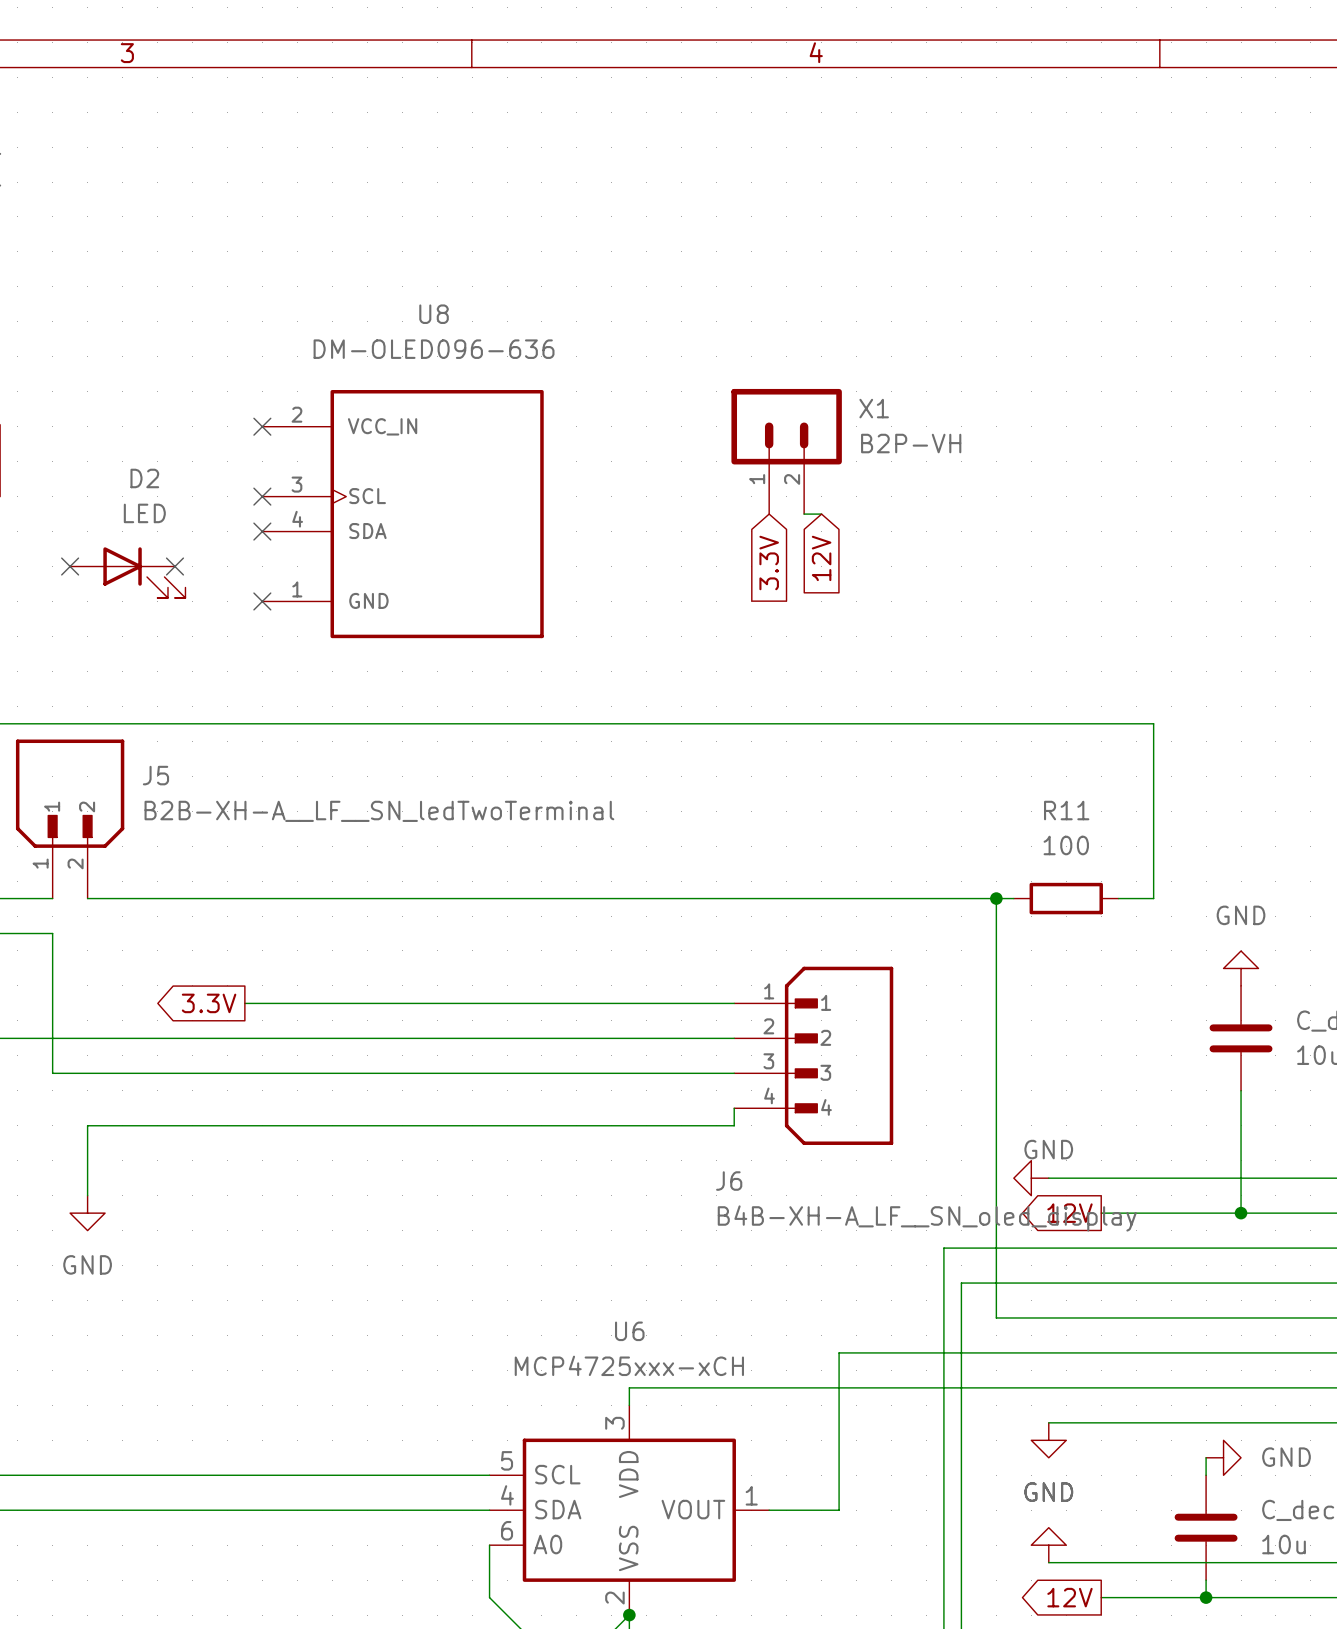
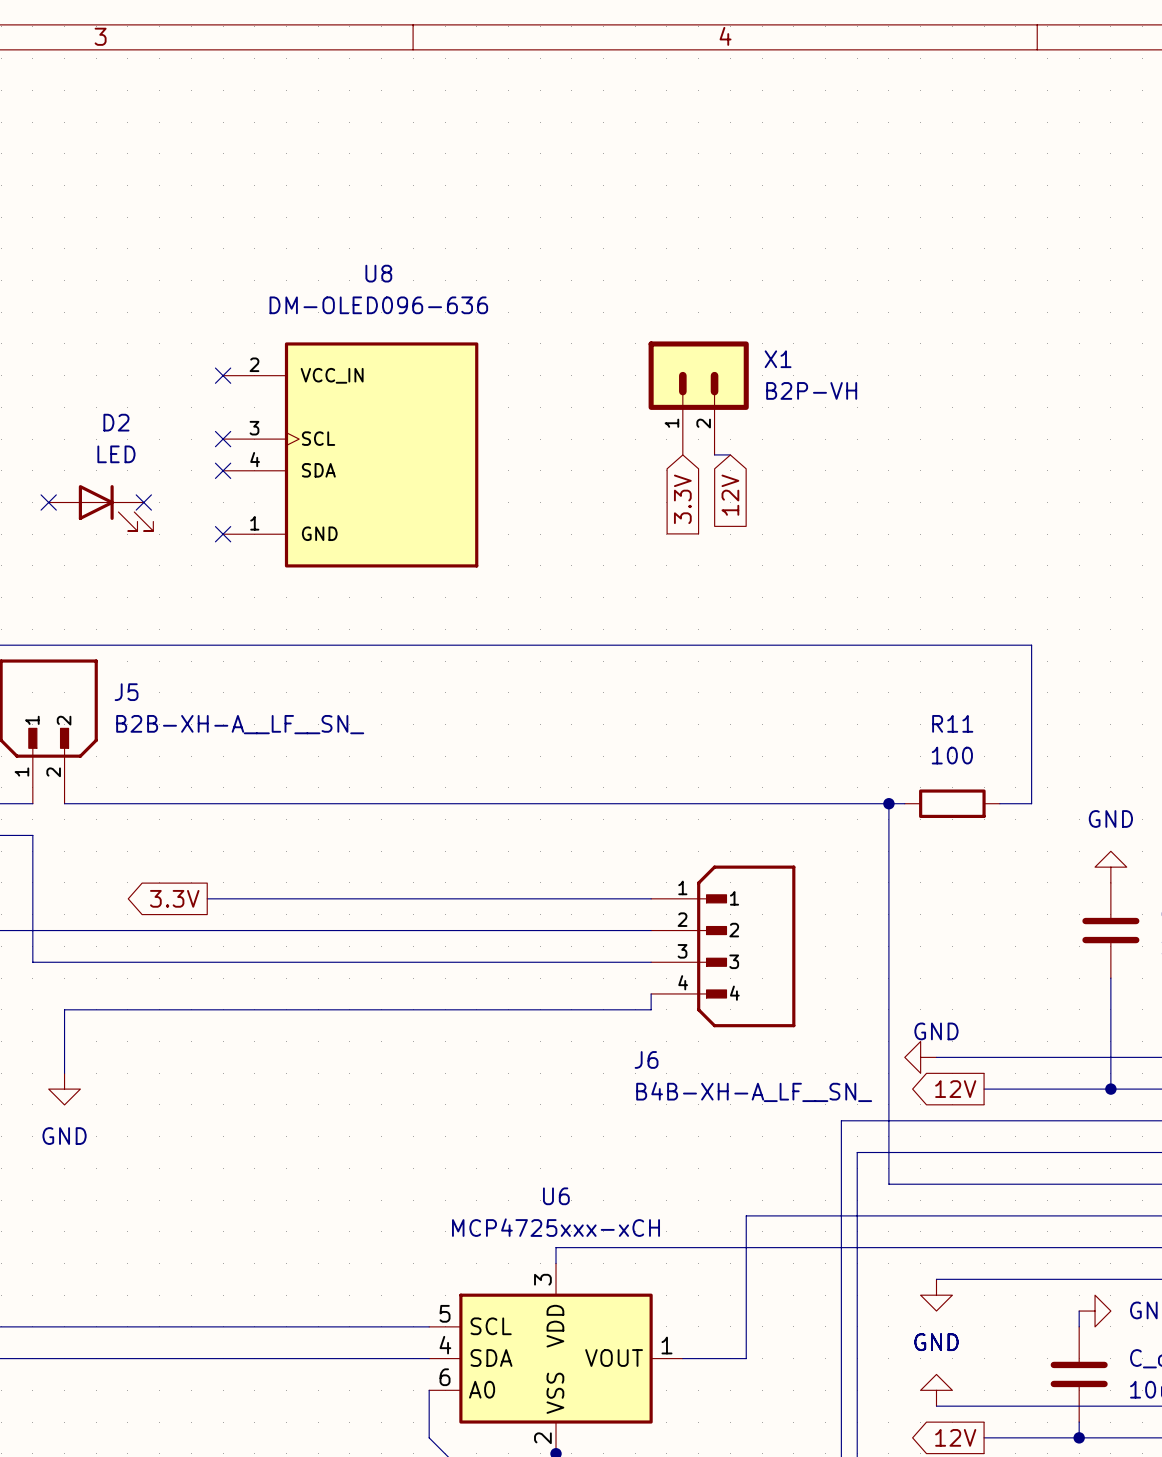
J5 value: B2B-XH-A__LF__SN_ledTwoTerminal (379, 811) -> B2B-XH-A__LF__SN_ (240, 724)
J6 value: B4B-XH-A_LF__SN_oled_display (927, 1218) -> B4B-XH-A_LF__SN_ (754, 1092)

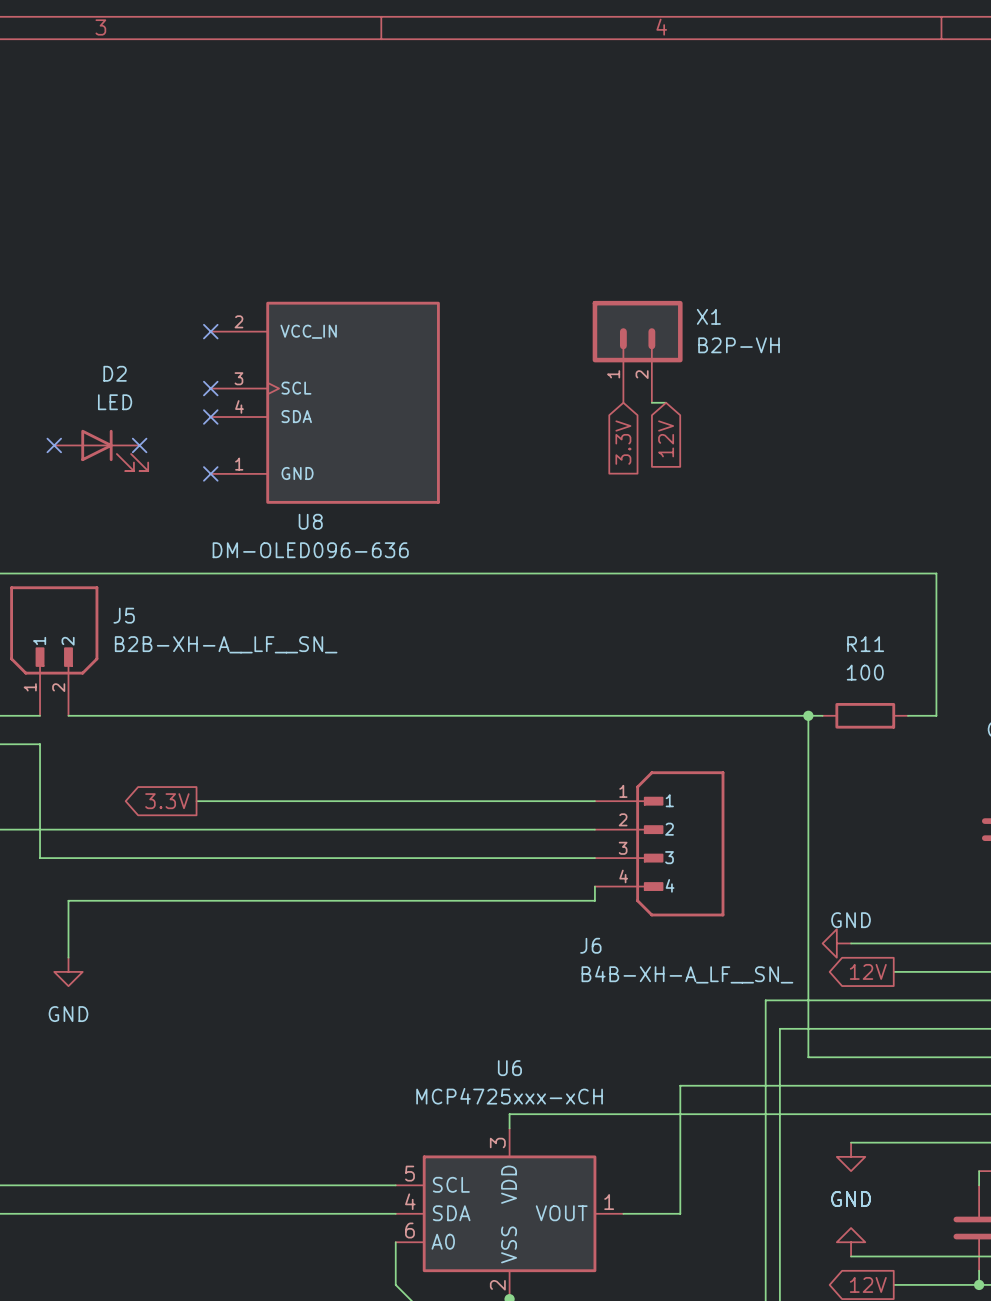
U8 name position: U8 (378, 273) -> U8 (310, 521)
U8 value position: DM-OLED096-636 (378, 305) -> DM-OLED096-636 (310, 550)

